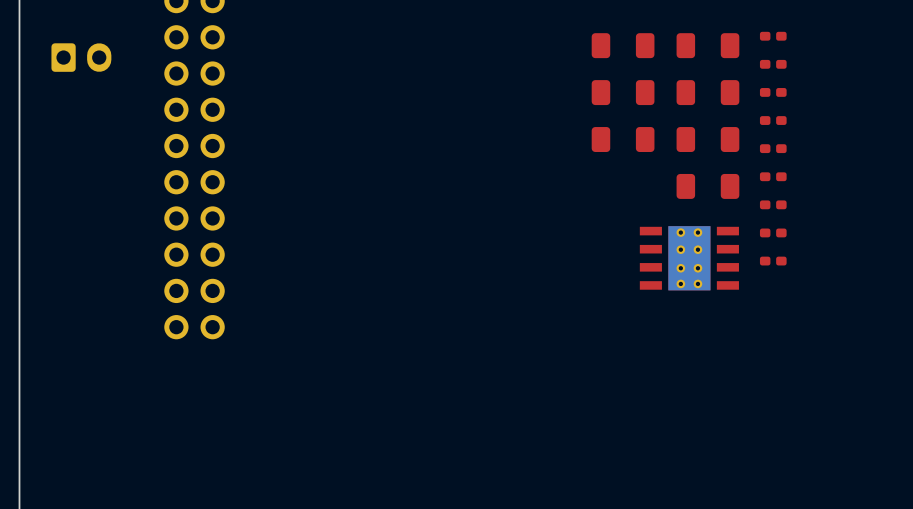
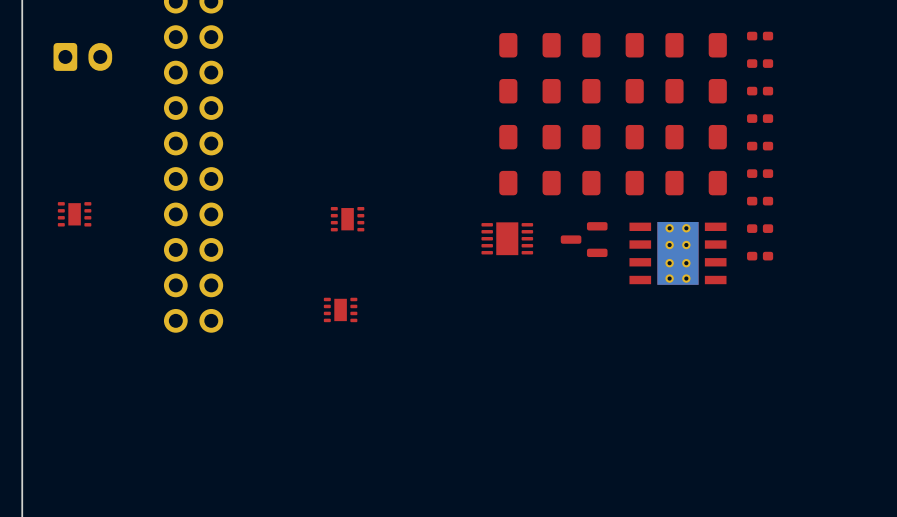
part: none -> (529, 45)
part: none -> (529, 91)
part: none -> (529, 137)
part: none -> (529, 183)
part: none -> (613, 183)
part: none -> (74, 214)
part: none -> (347, 219)
part: none -> (507, 238)
part: none -> (584, 239)
part: none -> (340, 309)

